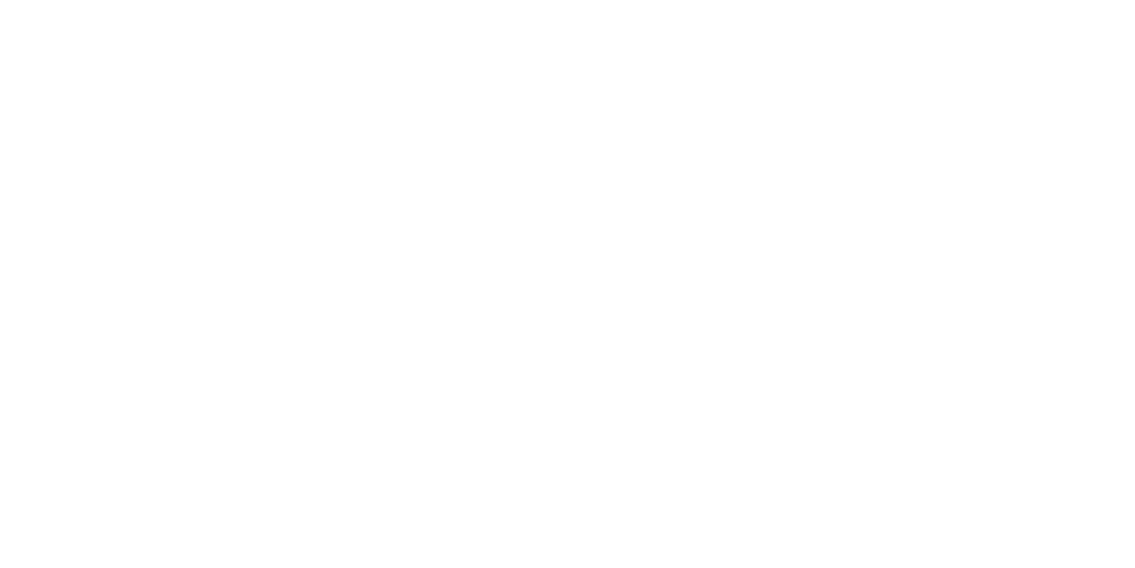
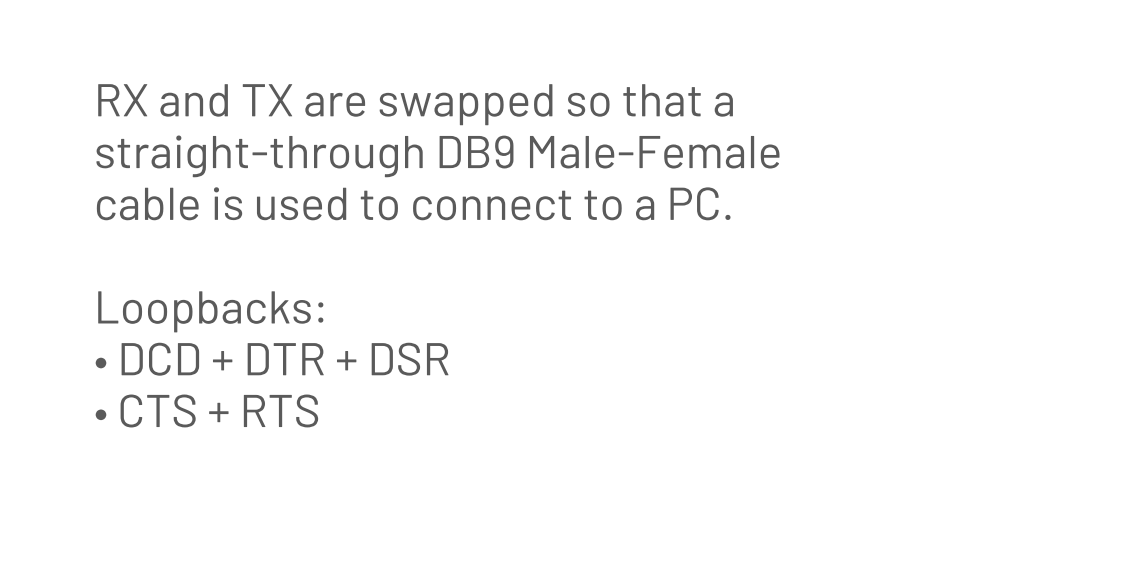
text: none -> RX and TX are swapped so that a (415, 104)
text: none -> straight-through DB9 Male-Female (437, 156)
text: none -> cable is used to connect to a PC. (413, 203)
text: none -> Loopbacks: (210, 311)
text: none -> • DCD + DTR + DSR (272, 359)
text: none -> • CTS + RTS (206, 411)

